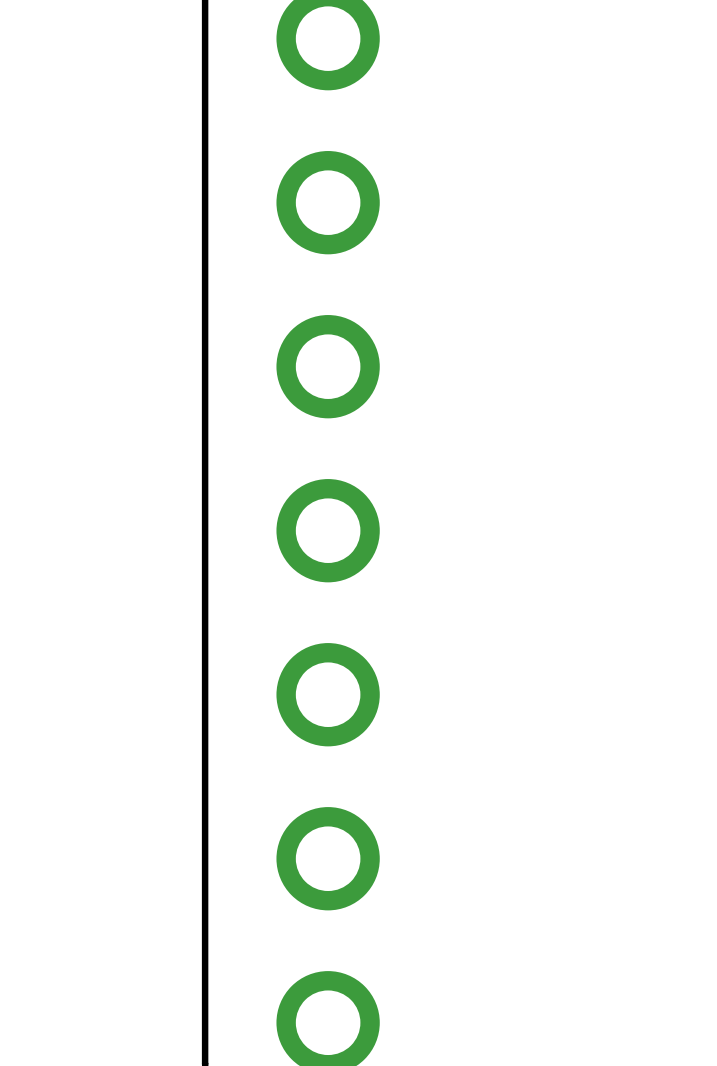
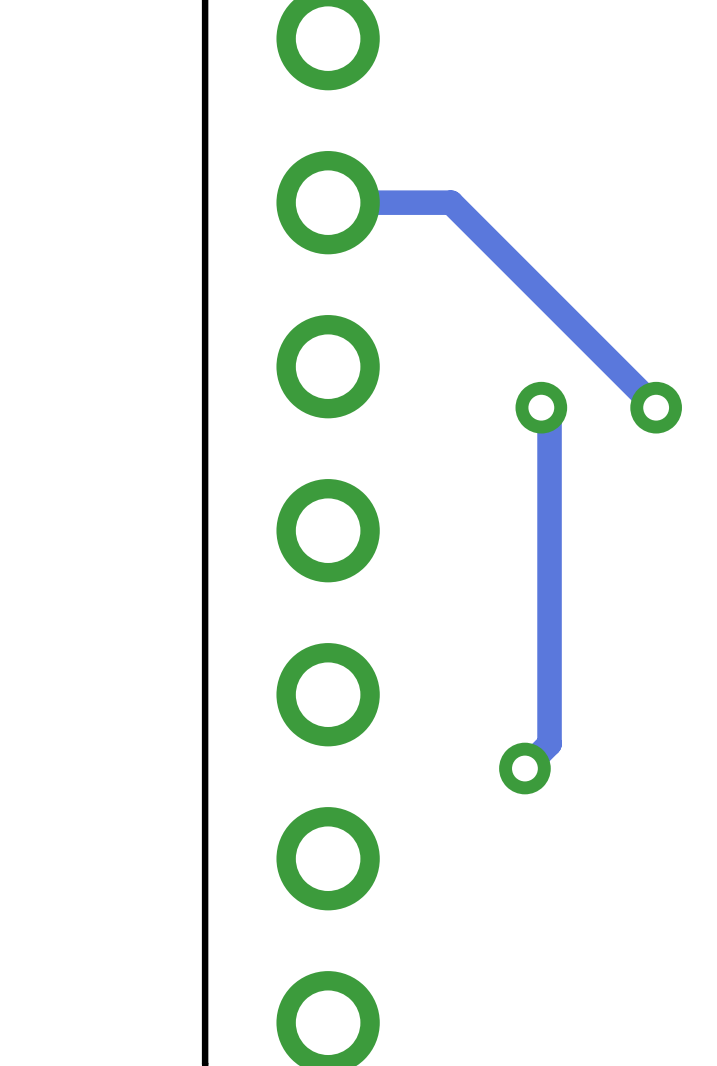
track: none -> (328, 202) (451, 202) (656, 407)
track: none -> (541, 407) (549, 415) (549, 743) (524, 768)
via: none -> (541, 407)
via: none -> (656, 407)
via: none -> (524, 768)

